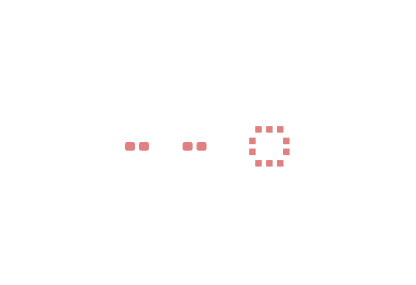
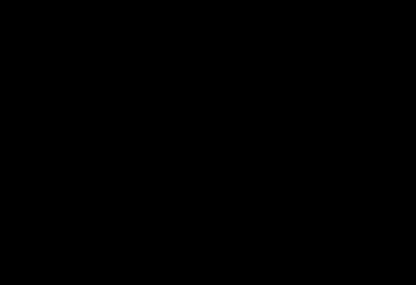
part: (136, 146) -> none
part: (194, 146) -> none
part: (269, 146) -> none

